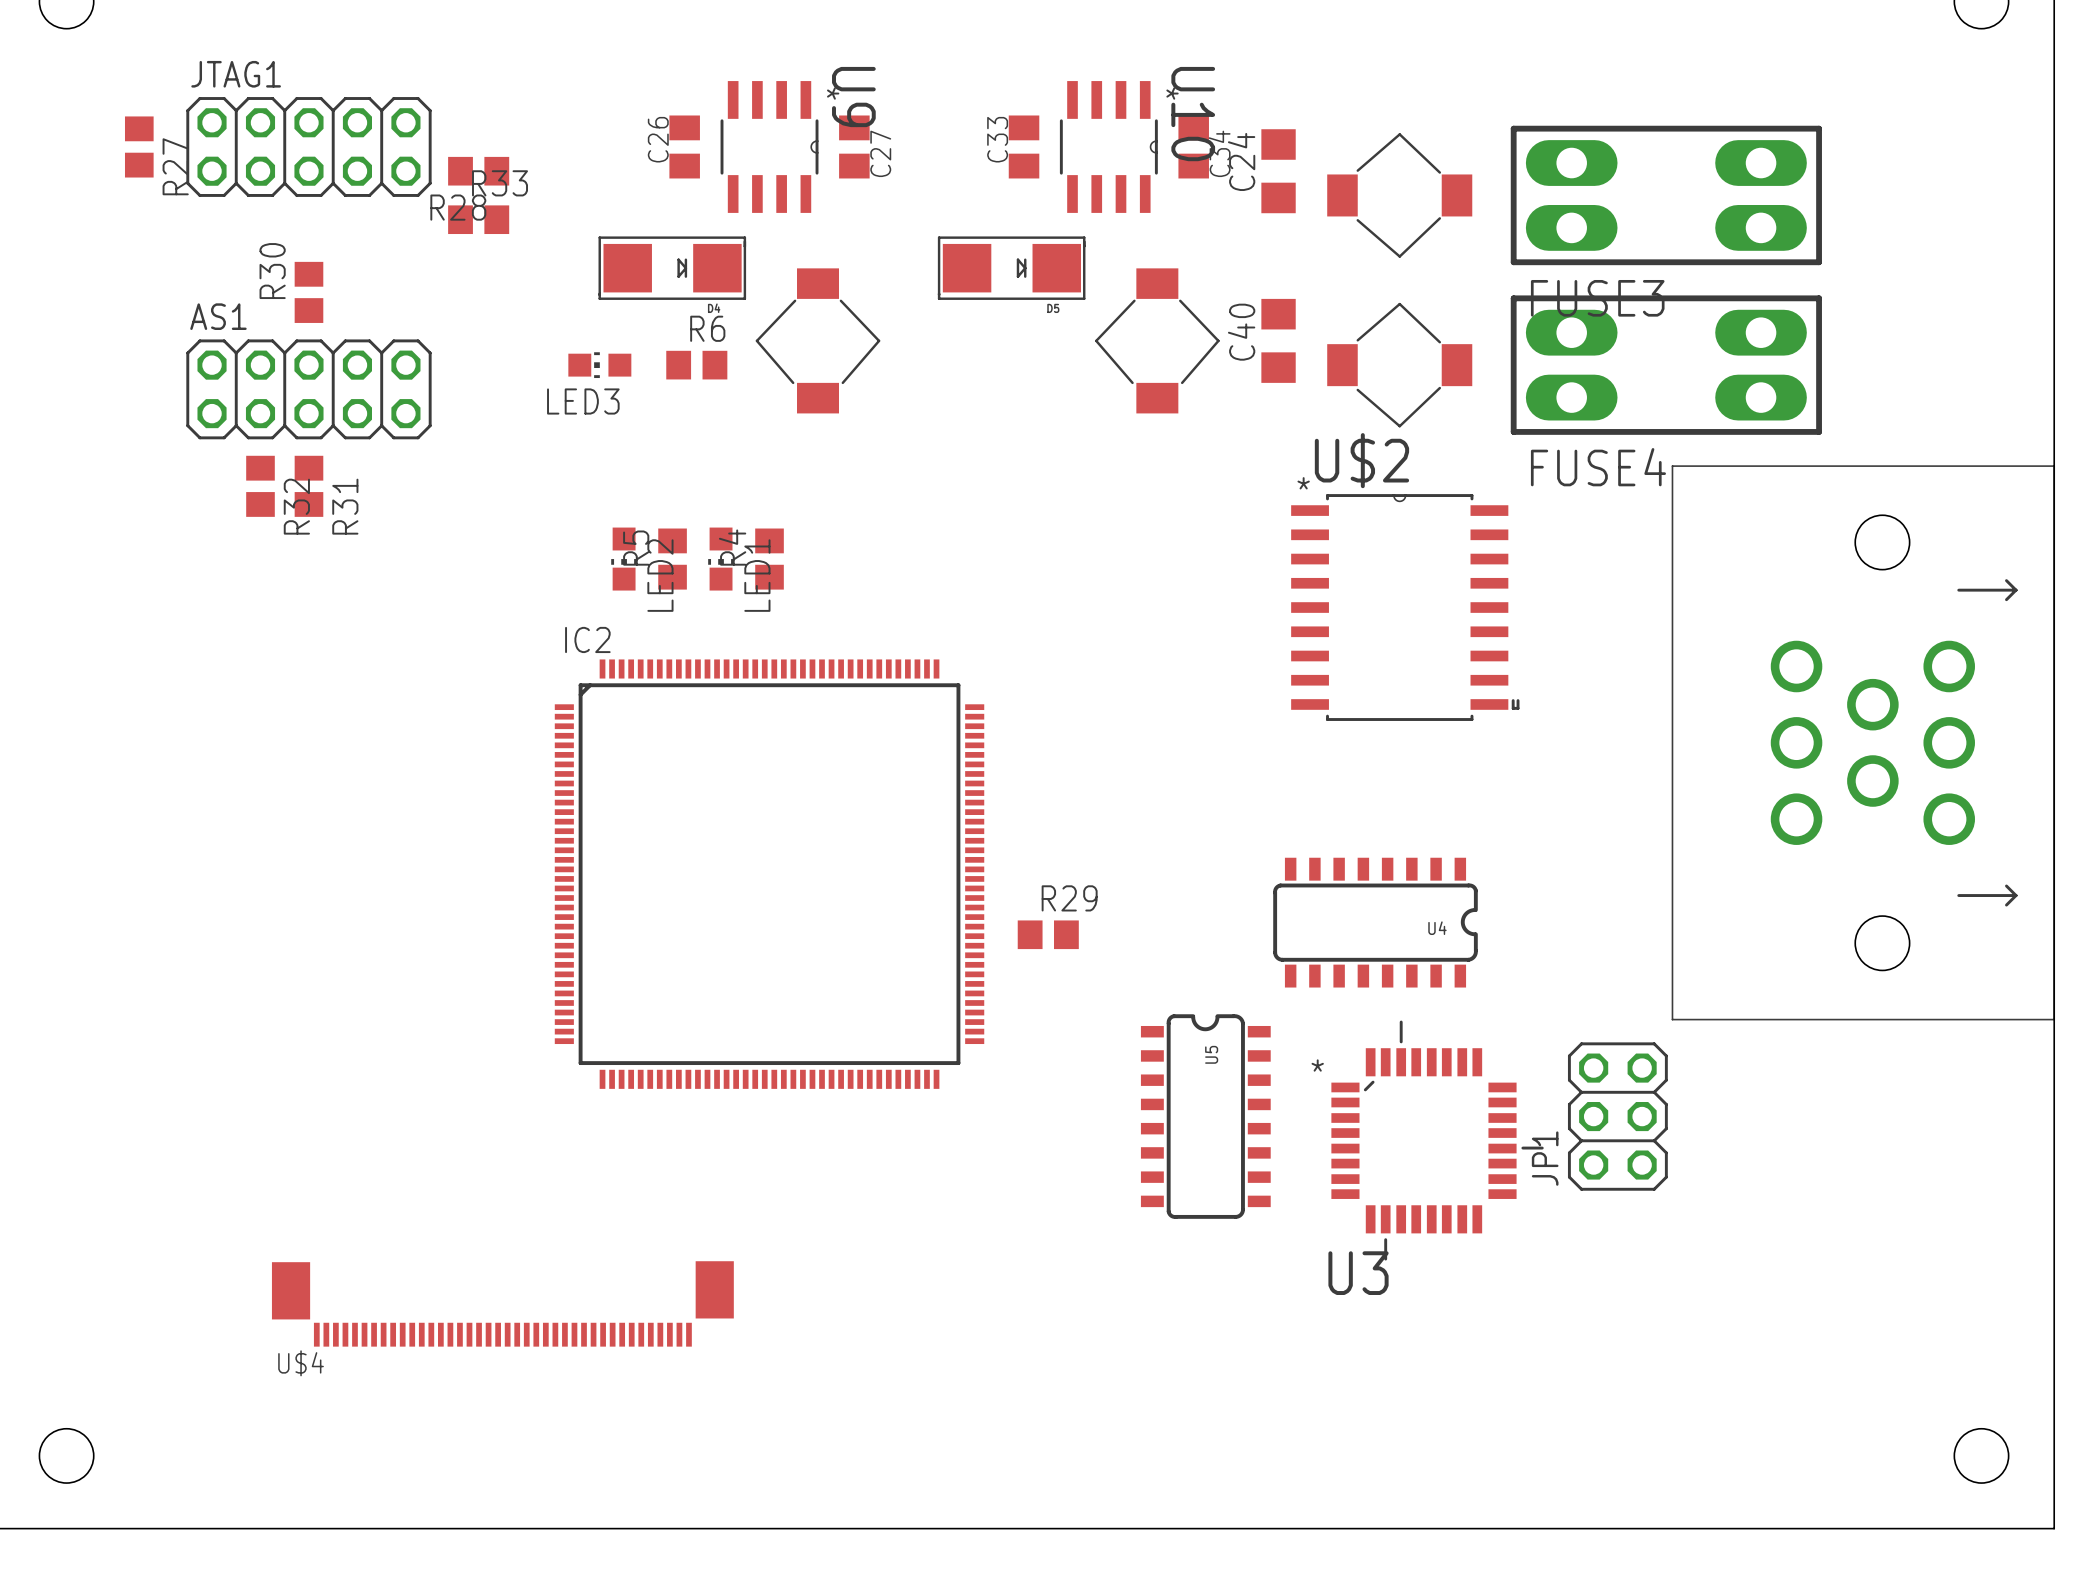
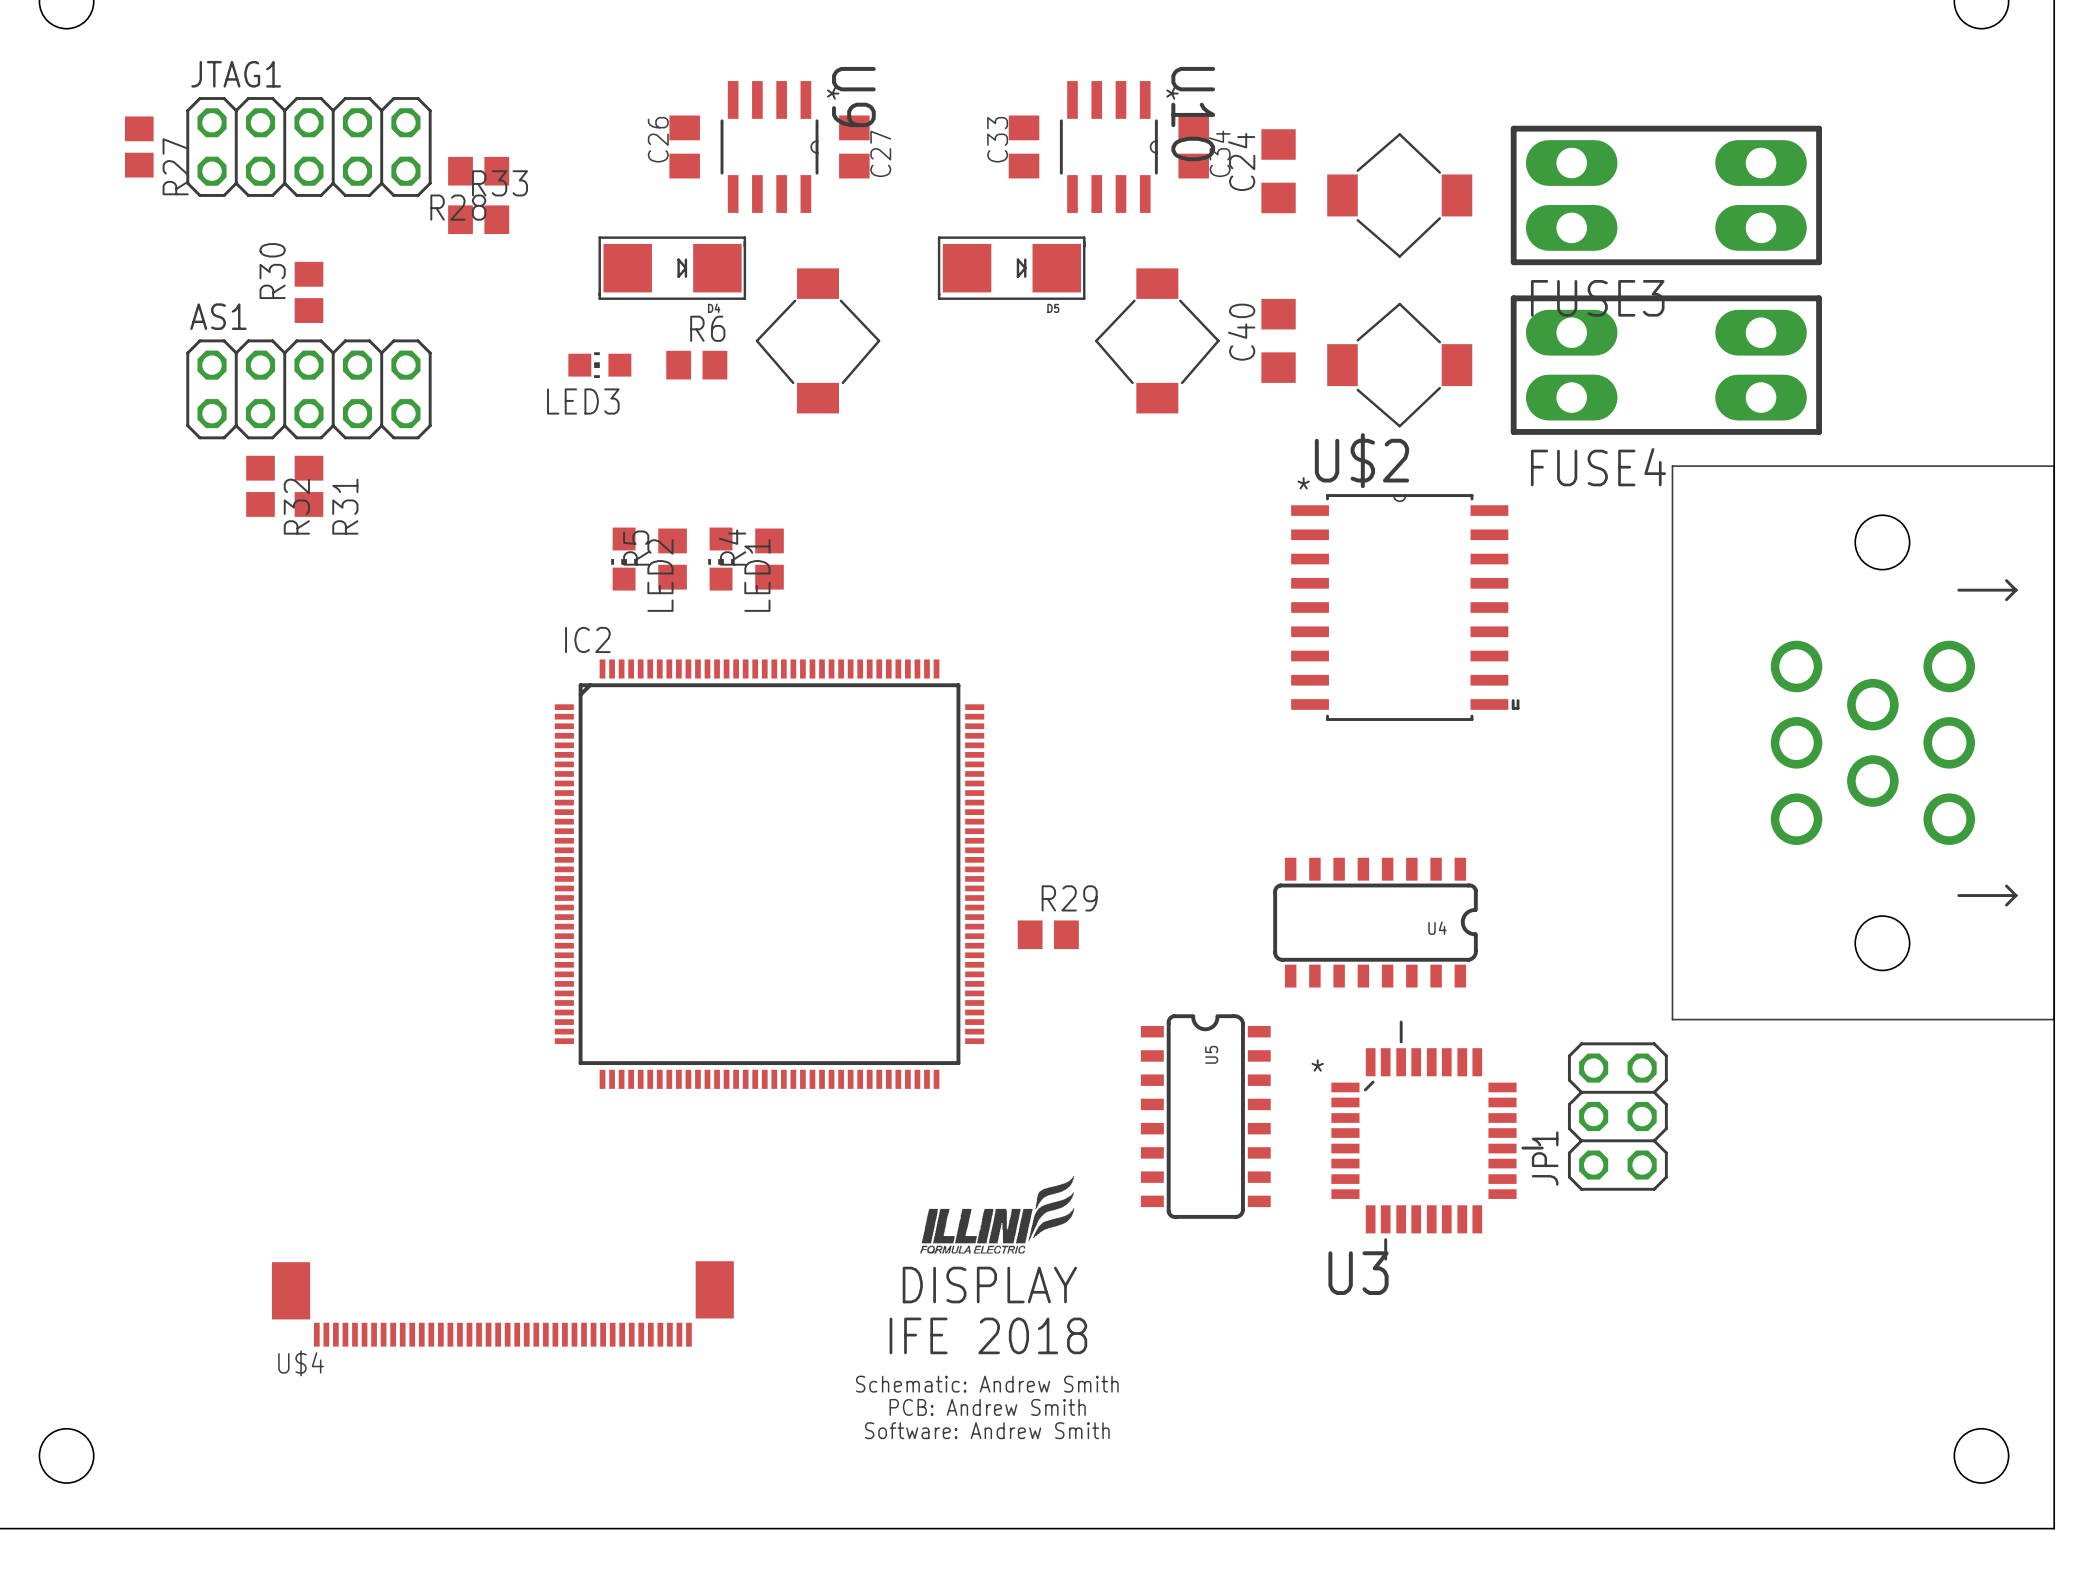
drawing: none -> [920, 1175, 1075, 1254]
text: none -> DISPLAY (989, 1285)
text: none -> IFE 2018 (988, 1335)
text: none -> Schematic: Andrew Smith (987, 1384)
text: none -> PCB: Andrew Smith (987, 1407)
text: none -> Software: Andrew Smith (987, 1430)

